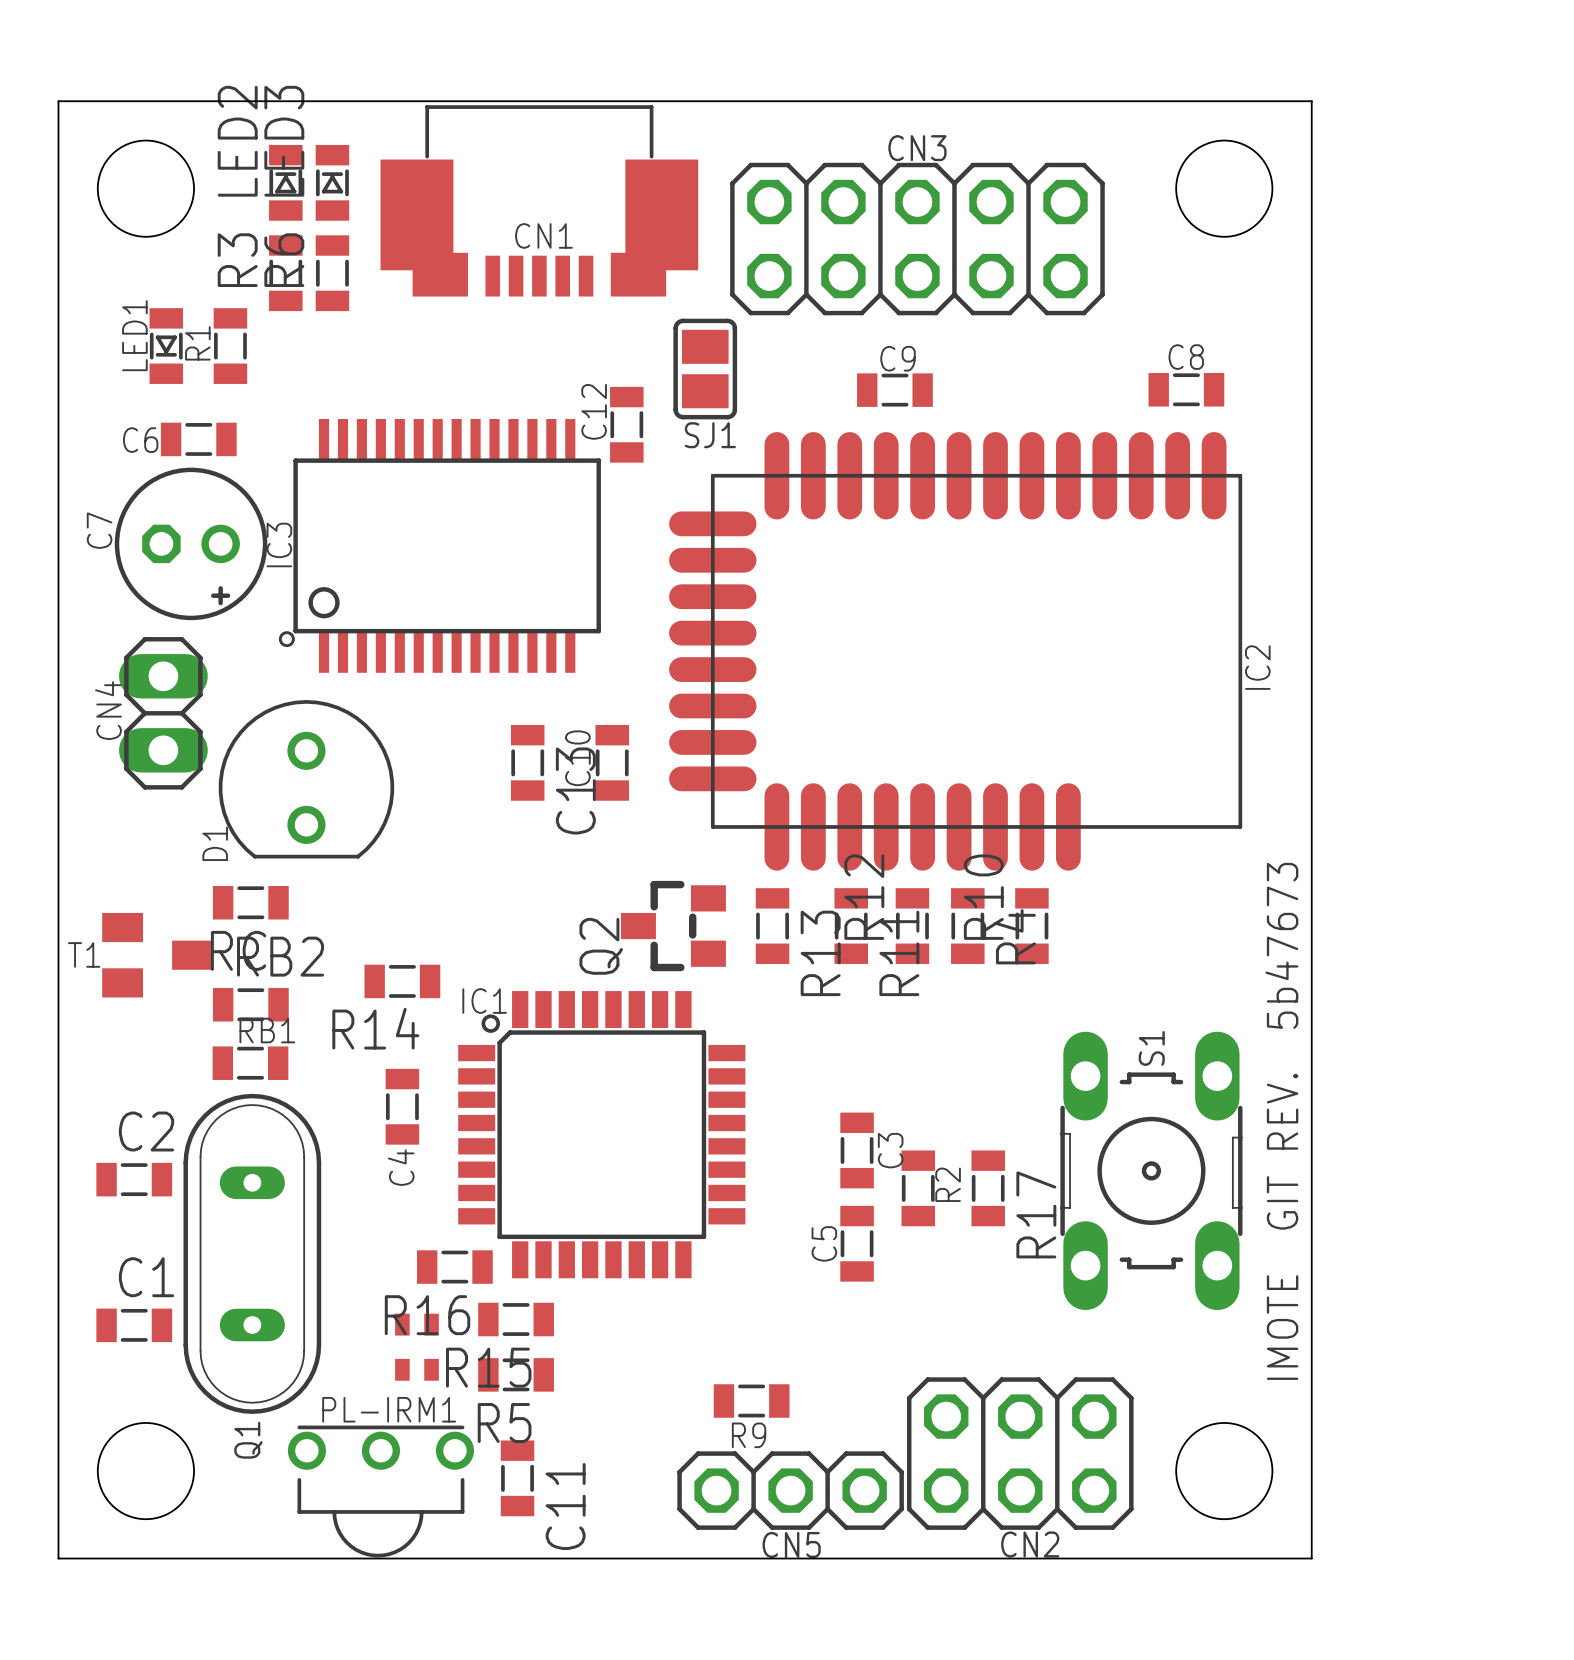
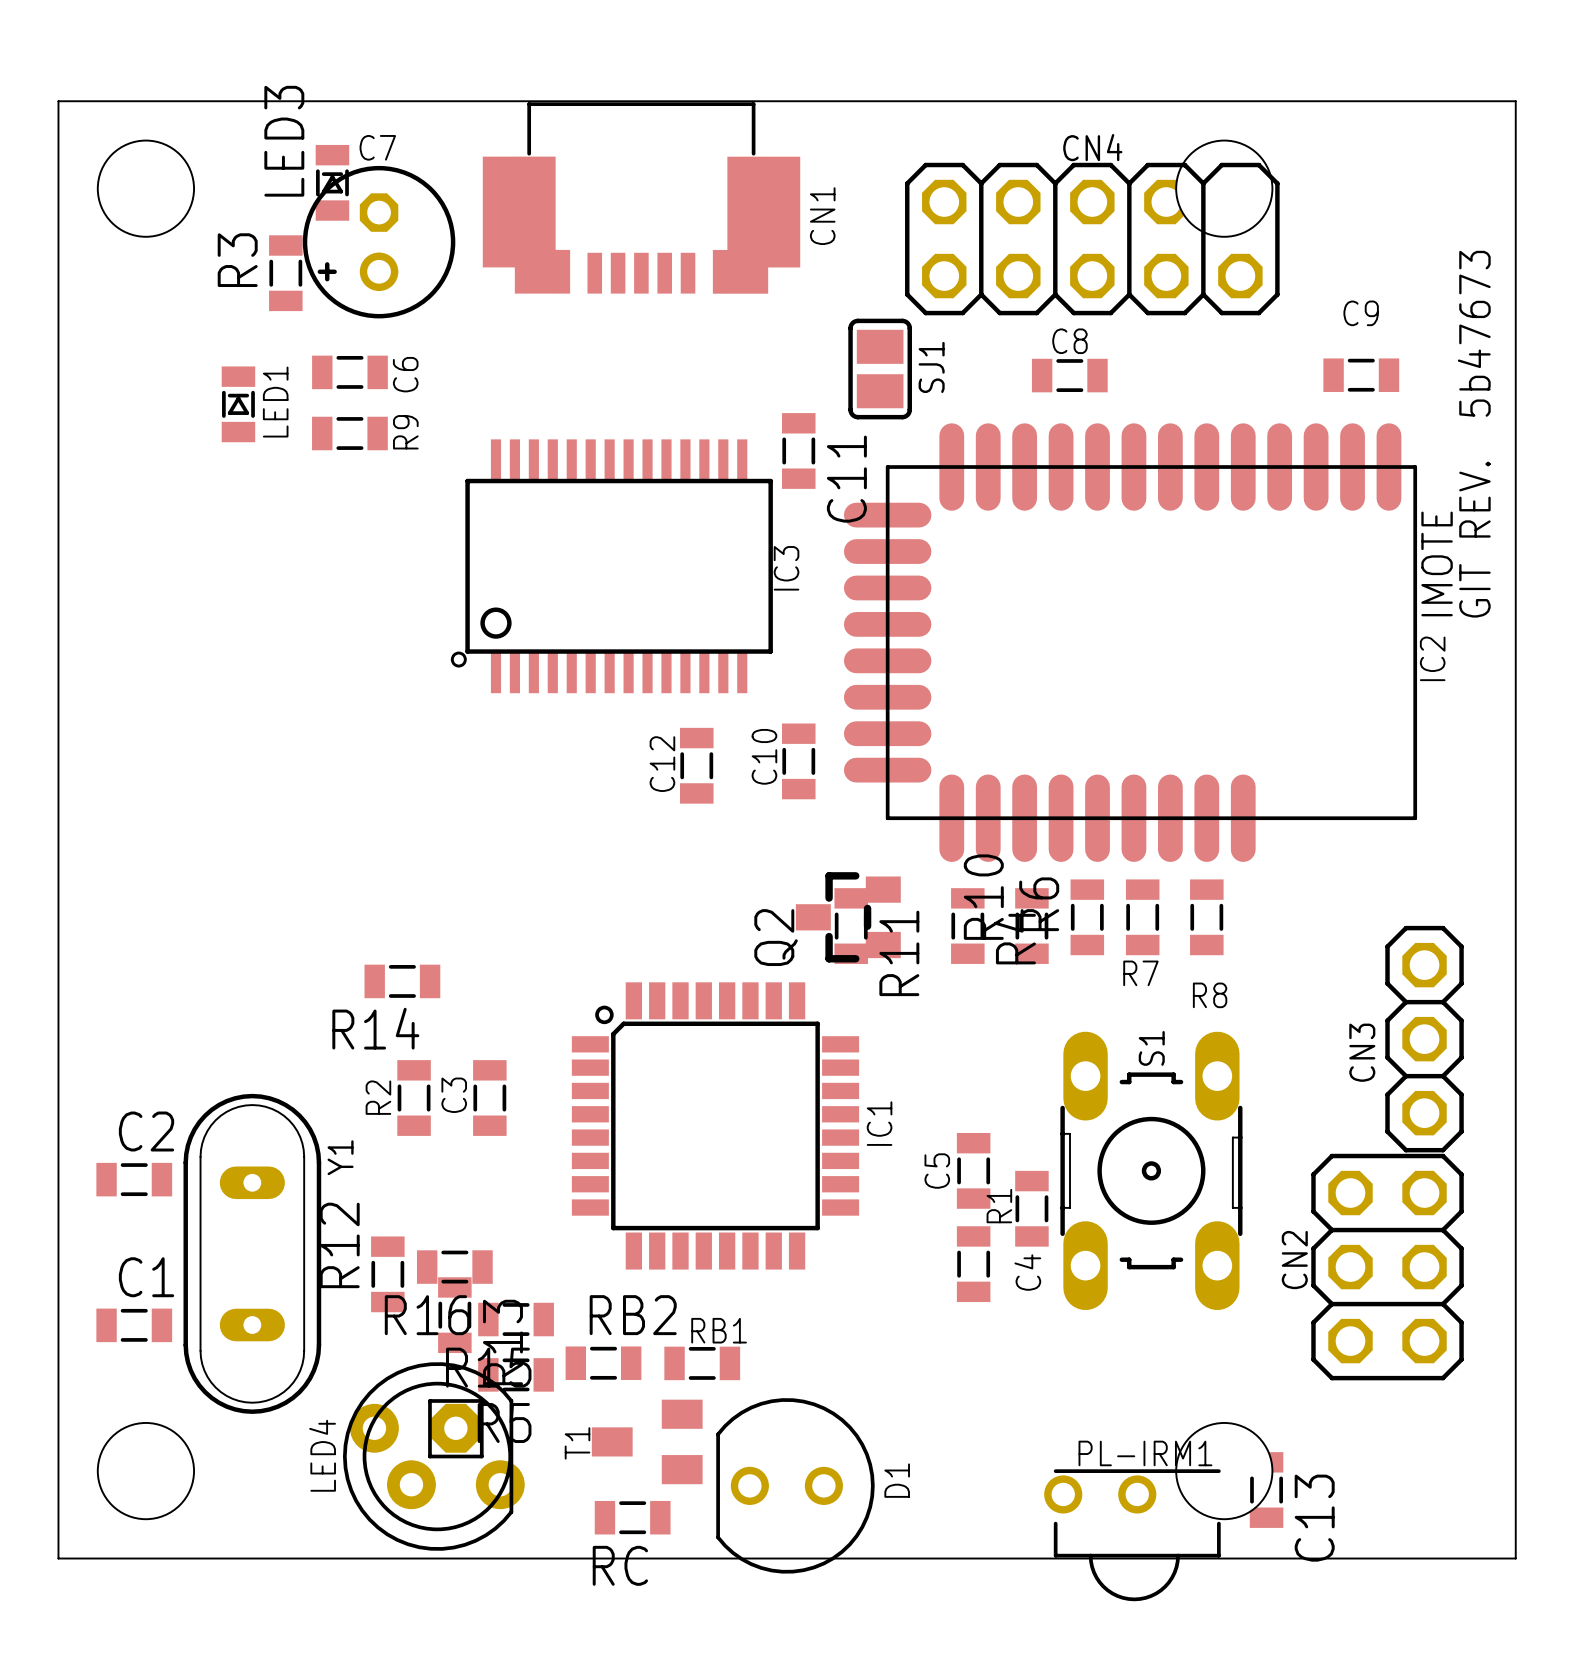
board edge: (1311, 101) (1311, 1558) -> (1311, 101) (1515, 101) (1515, 1558) (1311, 1558)
CN1 footprint: [380, 105, 699, 297] -> [482, 102, 801, 294]
CN3 name position: CN3 (917, 148) -> CN3 (1362, 1052)
CN3 footprint: [730, 162, 1105, 316] -> [1385, 925, 1464, 1153]
LED2: (285, 182) -> none
CN1 name position: CN1 (543, 235) -> CN1 (822, 216)
R6 position: (332, 273) -> (1087, 917)
LED1 rotation: 0° (166, 346) -> 180° (238, 404)
LED1 position: (166, 346) -> (238, 404)
R1 position: (230, 346) -> (1031, 1208)
C8 name position: C8 (1186, 357) -> C8 (1069, 341)
C9 name position: C9 (898, 358) -> C9 (1361, 313)
SJ1 position: (705, 369) -> (880, 369)
C8 position: (1186, 389) -> (1069, 375)
C9 position: (894, 390) -> (1361, 375)
C12 name position: C12 (594, 411) -> C12 (662, 764)
C12 position: (626, 424) -> (696, 765)
SJ1 name rotation: 0° (710, 435) -> 90° counterclockwise (931, 367)
SJ1 name position: SJ1 (710, 435) -> SJ1 (931, 367)
C6 position: (198, 439) -> (349, 372)
C6 name rotation: 0° (140, 440) -> 90° counterclockwise (405, 374)
C6 name position: C6 (140, 440) -> C6 (405, 374)
C7 footprint: [114, 467, 268, 621] -> [302, 165, 456, 319]
C7 name position: C7 (99, 530) -> C7 (377, 147)
IC3 name position: IC3 (279, 544) -> IC3 (786, 568)
IC3 position: (439, 545) -> (611, 566)
text: none -> IMOTE (1437, 563)
CN4 footprint: [118, 637, 208, 790] -> [905, 162, 1280, 316]
IC2 position: (955, 651) -> (1130, 642)
CN4 name position: CN4 (108, 710) -> CN4 (1092, 147)
C13 position: (527, 762) -> (1266, 1490)
C10 position: (612, 762) -> (798, 761)
D1 rotation: 0° (306, 779) -> 90° clockwise (795, 1485)
D1 position: (306, 779) -> (795, 1485)
D1 name position: D1 (215, 843) -> D1 (897, 1480)
RC position: (250, 902) -> (632, 1517)
R7: none -> (1142, 917)
R8: none -> (1206, 917)
Q2 position: (673, 926) -> (848, 917)
R13 position: (772, 926) -> (454, 1315)
R12 position: (912, 926) -> (387, 1274)
T1 rotation: 0° (157, 955) -> 180° (647, 1441)
T1 position: (157, 955) -> (647, 1441)
IC1 name rotation: 0° (484, 1001) -> 90° counterclockwise (879, 1123)
IC1 name position: IC1 (484, 1001) -> IC1 (879, 1123)
RB2 position: (250, 1004) -> (603, 1363)
drawing position: (1281, 1046) -> (1474, 434)
RB1 position: (250, 1063) -> (702, 1363)
C4 position: (402, 1106) -> (973, 1264)
IC1 position: (601, 1134) -> (715, 1125)
C3 position: (857, 1150) -> (489, 1098)
C3 name position: C3 (890, 1150) -> C3 (454, 1095)
C4 name position: C4 (401, 1167) -> C4 (1027, 1272)
R2 name position: R2 (948, 1184) -> R2 (378, 1097)
R2 position: (918, 1188) -> (414, 1098)
R17: (988, 1188) -> none
C5 name position: C5 (824, 1243) -> C5 (937, 1171)
C5 position: (857, 1243) -> (973, 1170)
text: IMOTE (1282, 1327) -> none
part: (416, 1347) -> none
R9 position: (751, 1401) -> (349, 433)
R9 name rotation: 0° (749, 1435) -> 90° counterclockwise (405, 432)
R9 name position: R9 (749, 1435) -> R9 (405, 432)
Q1 name: Q1 (248, 1440) -> Y1 (340, 1157)
CN2 rotation: 0° (1020, 1453) -> 90° clockwise (1387, 1267)
CN2 position: (1020, 1453) -> (1387, 1267)
LED4: none -> (433, 1456)
C11 position: (517, 1478) -> (798, 450)
CN5: (790, 1490) -> none
PL-IRM1 position: (380, 1491) -> (1137, 1535)

